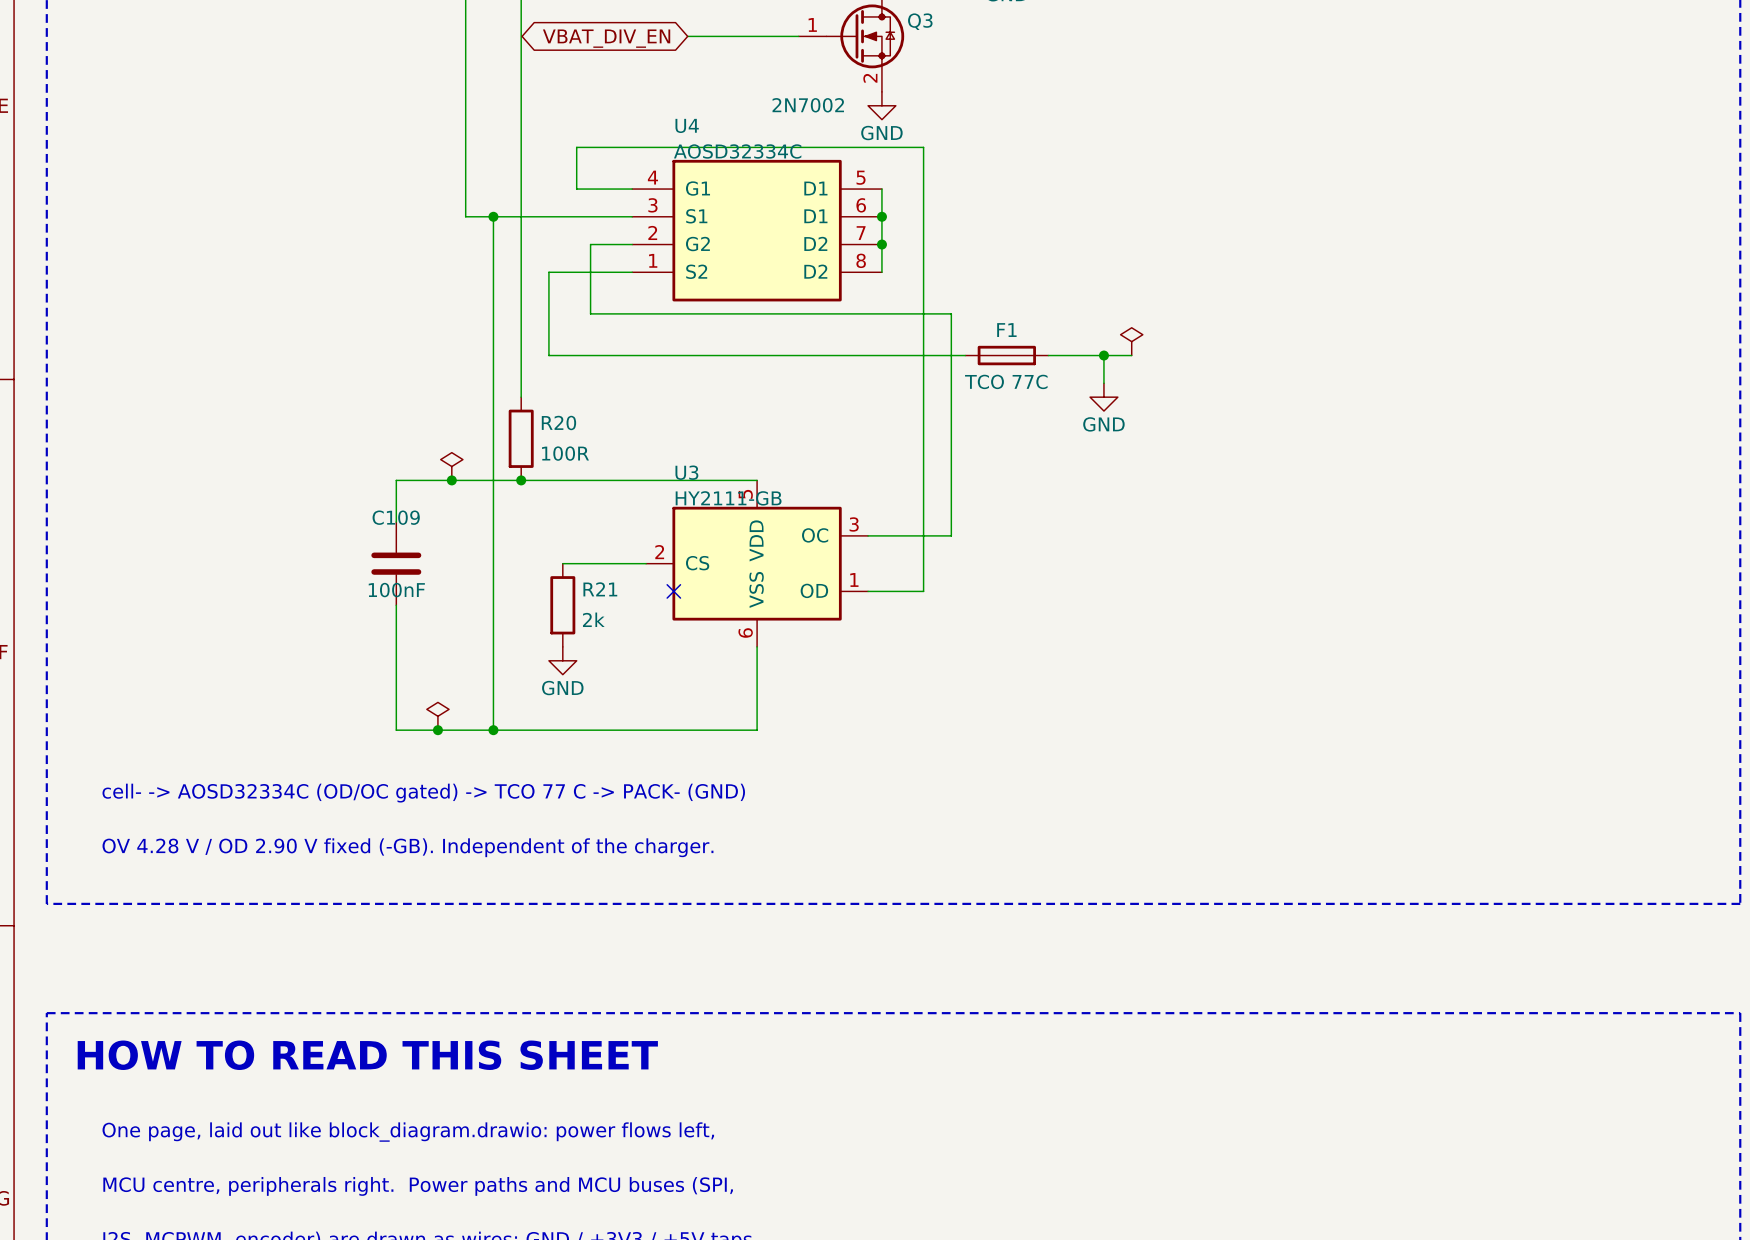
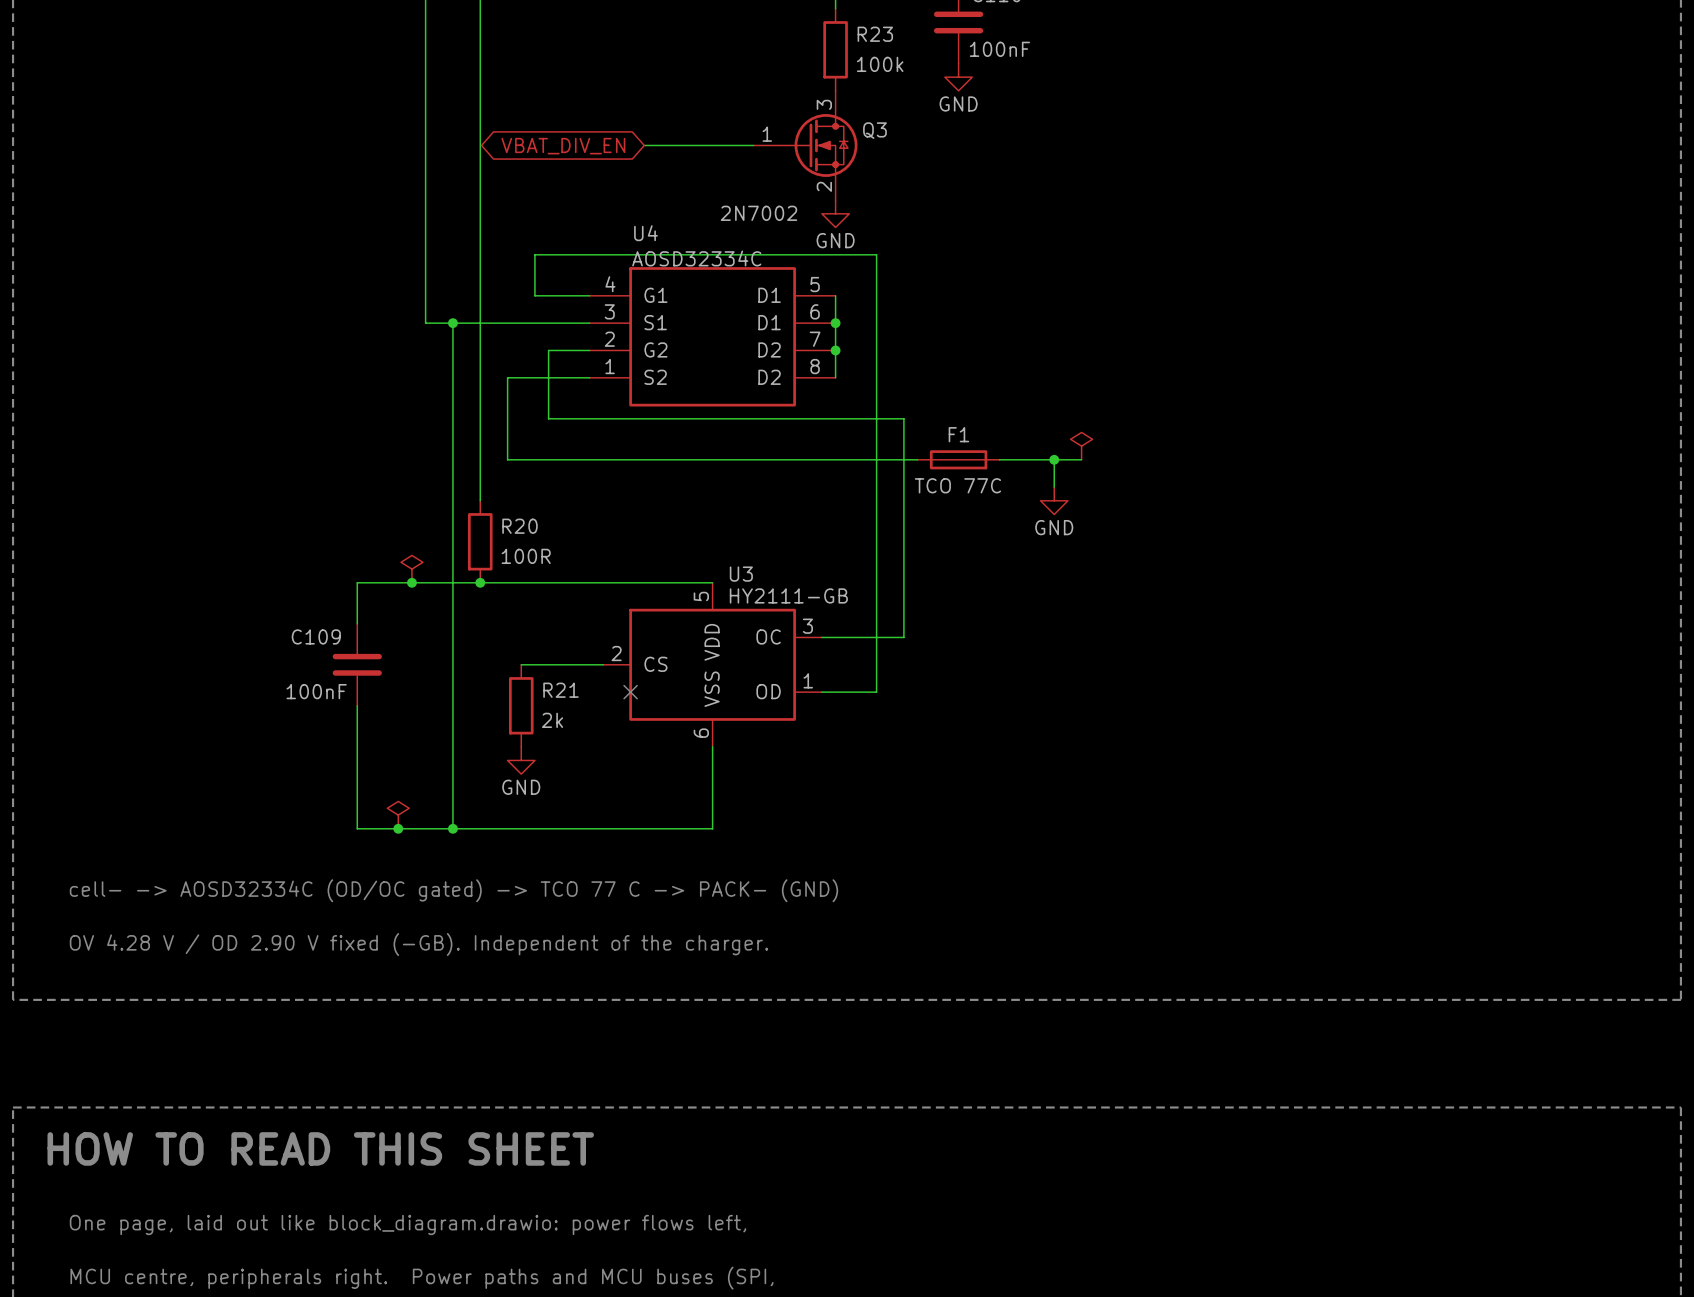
U3 name position: U3 (686, 472) -> U3 (741, 574)
U3 value position: HY2111-GB (728, 498) -> HY2111-GB (788, 595)
C109 name position: C109 (396, 517) -> C109 (316, 636)
C109 value position: 100nF (396, 590) -> 100nF (316, 691)

